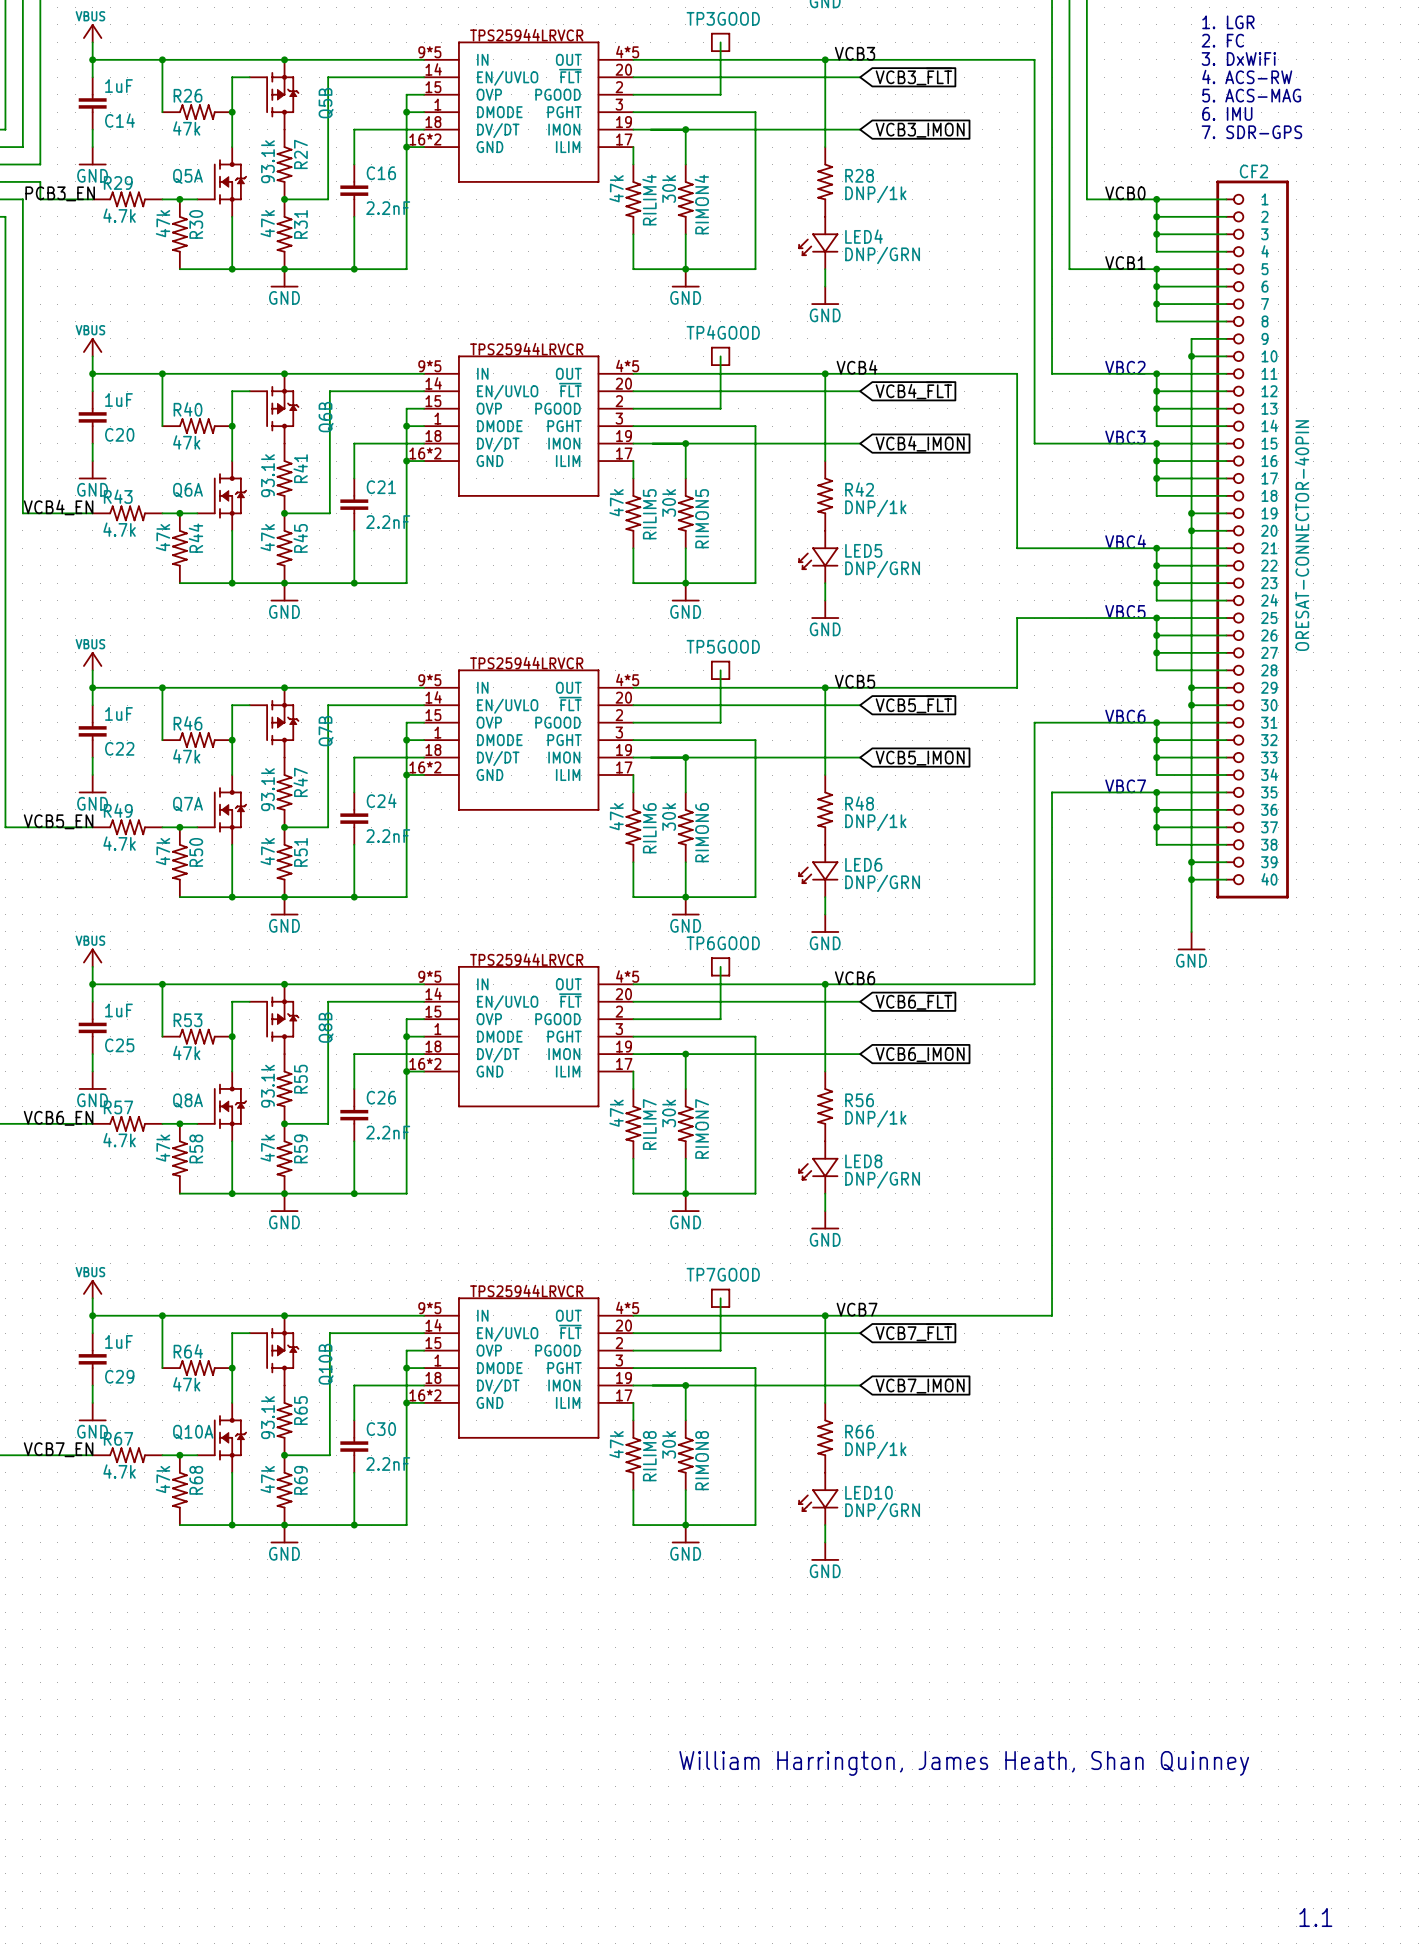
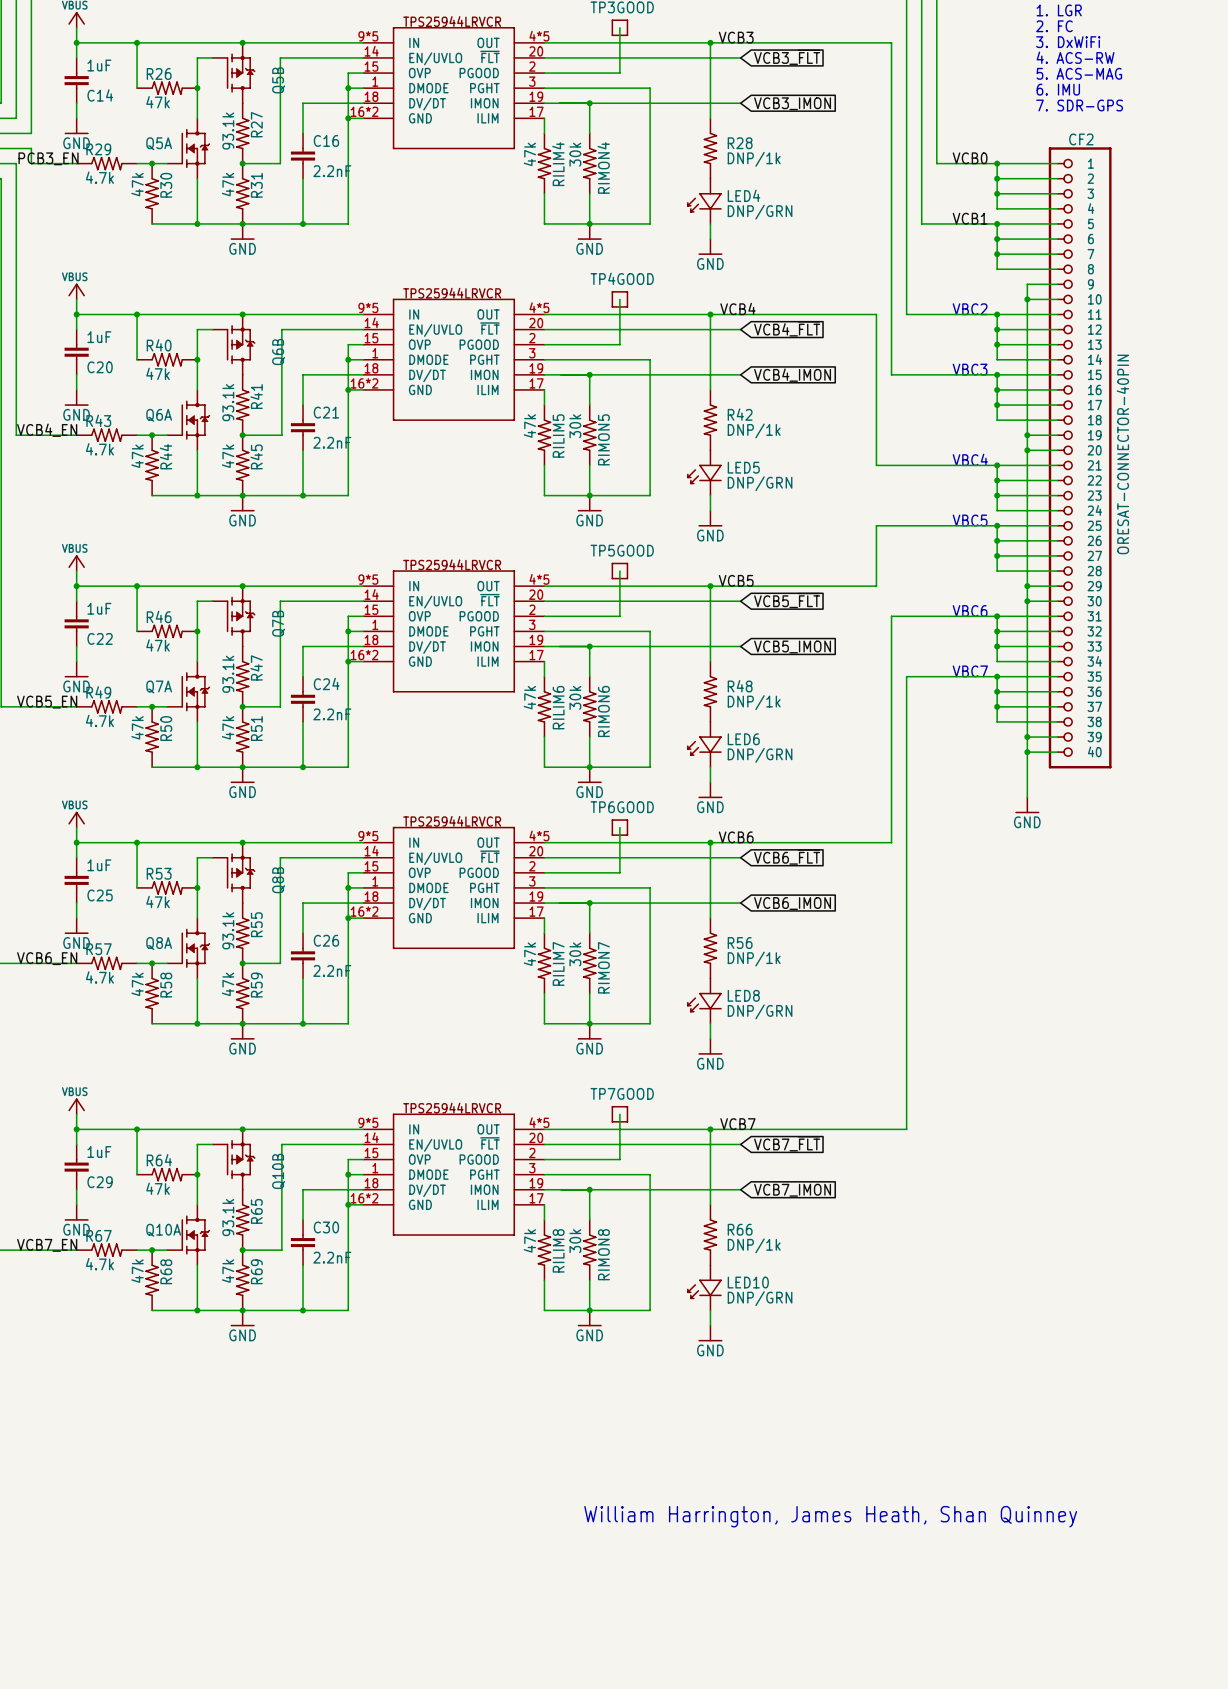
text: 1.1 (1315, 1917) -> none

